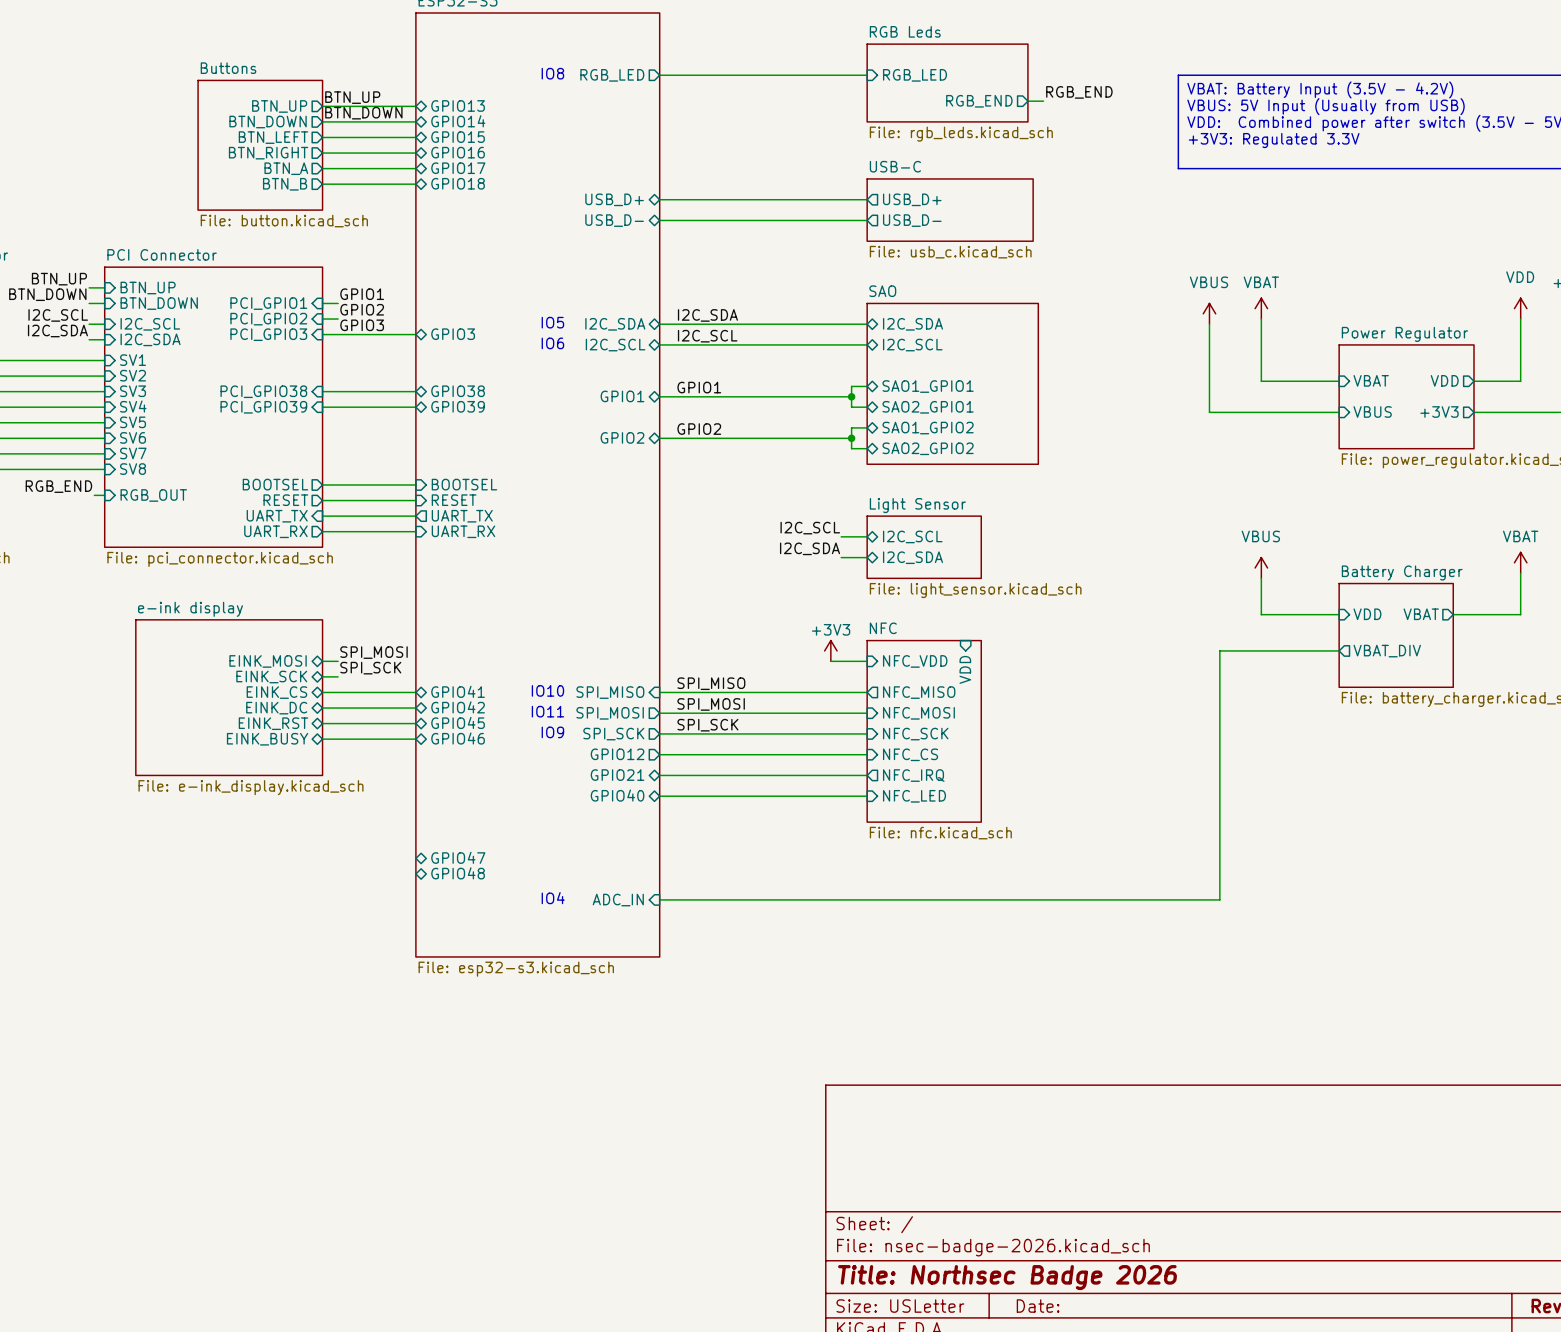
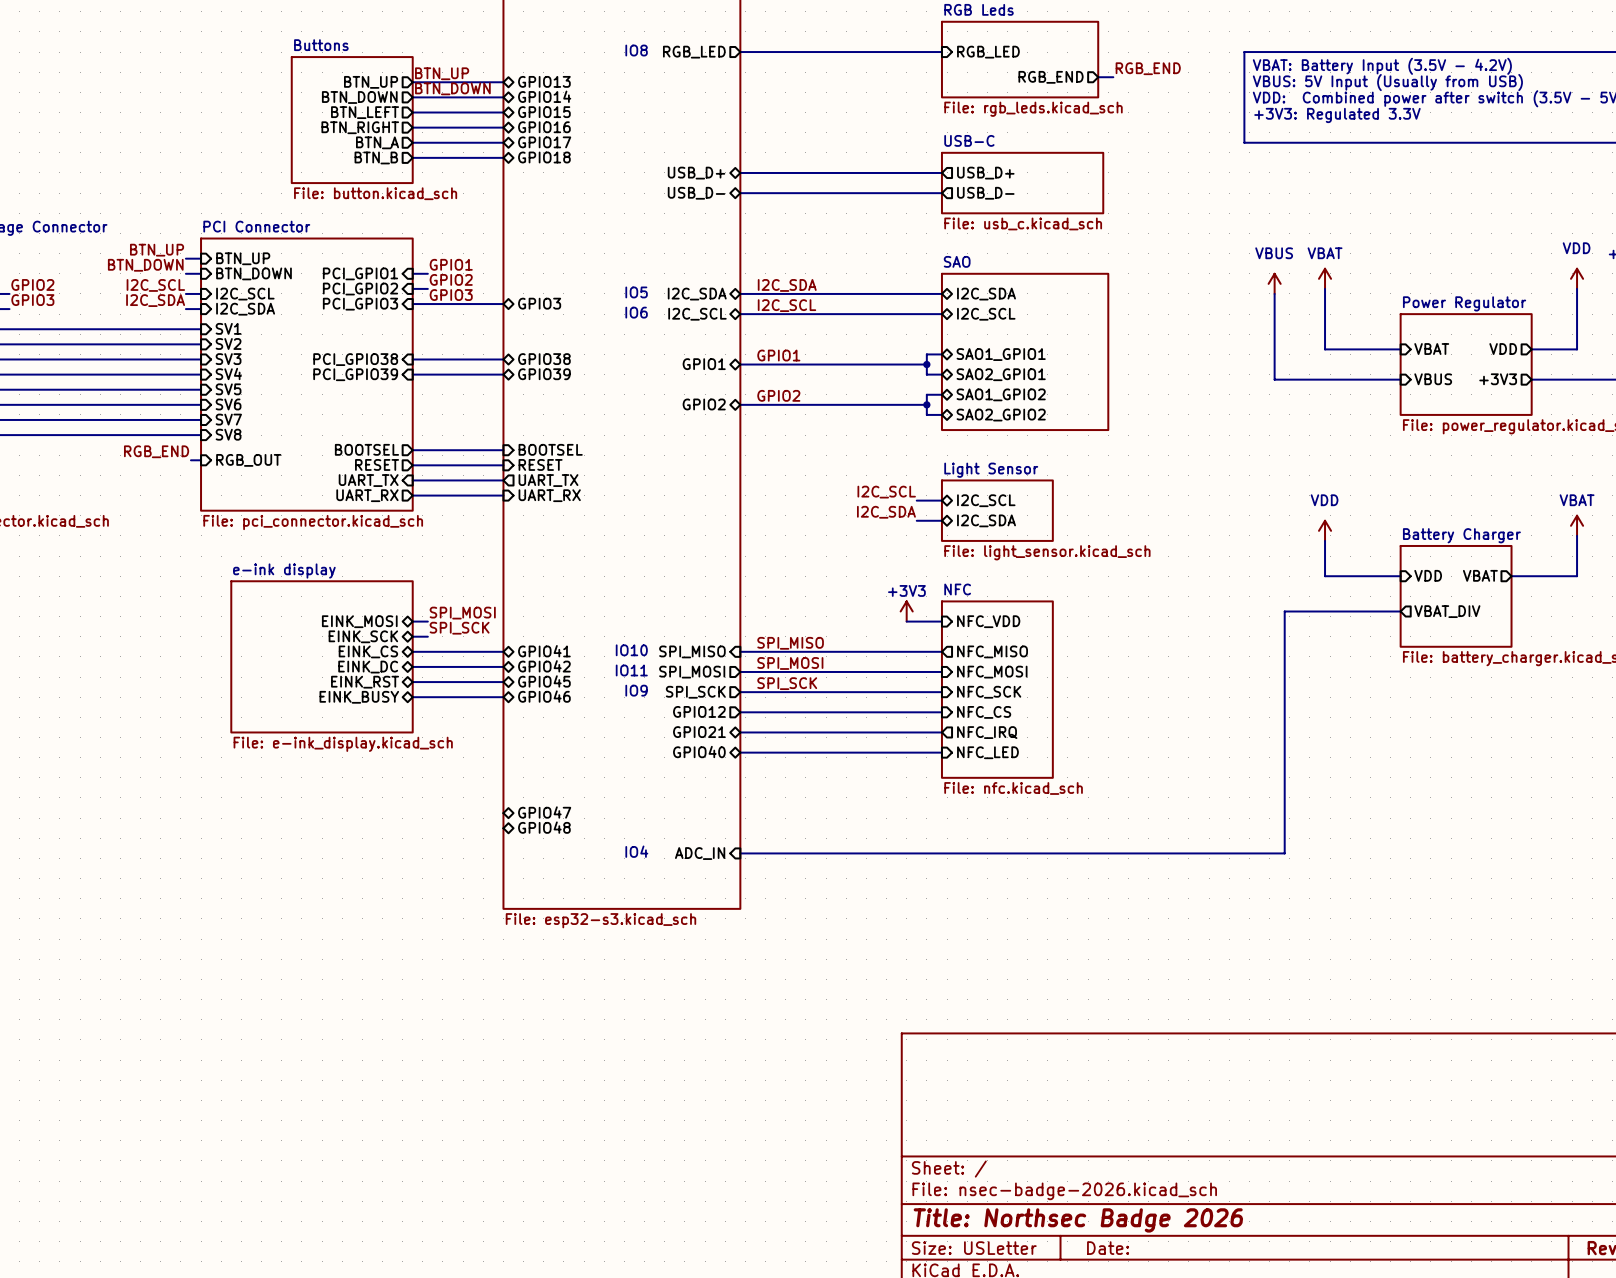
power symbol: VBUS (1261, 567) -> VDD (1325, 530)
sheet pin: VDD (965, 669) -> none

